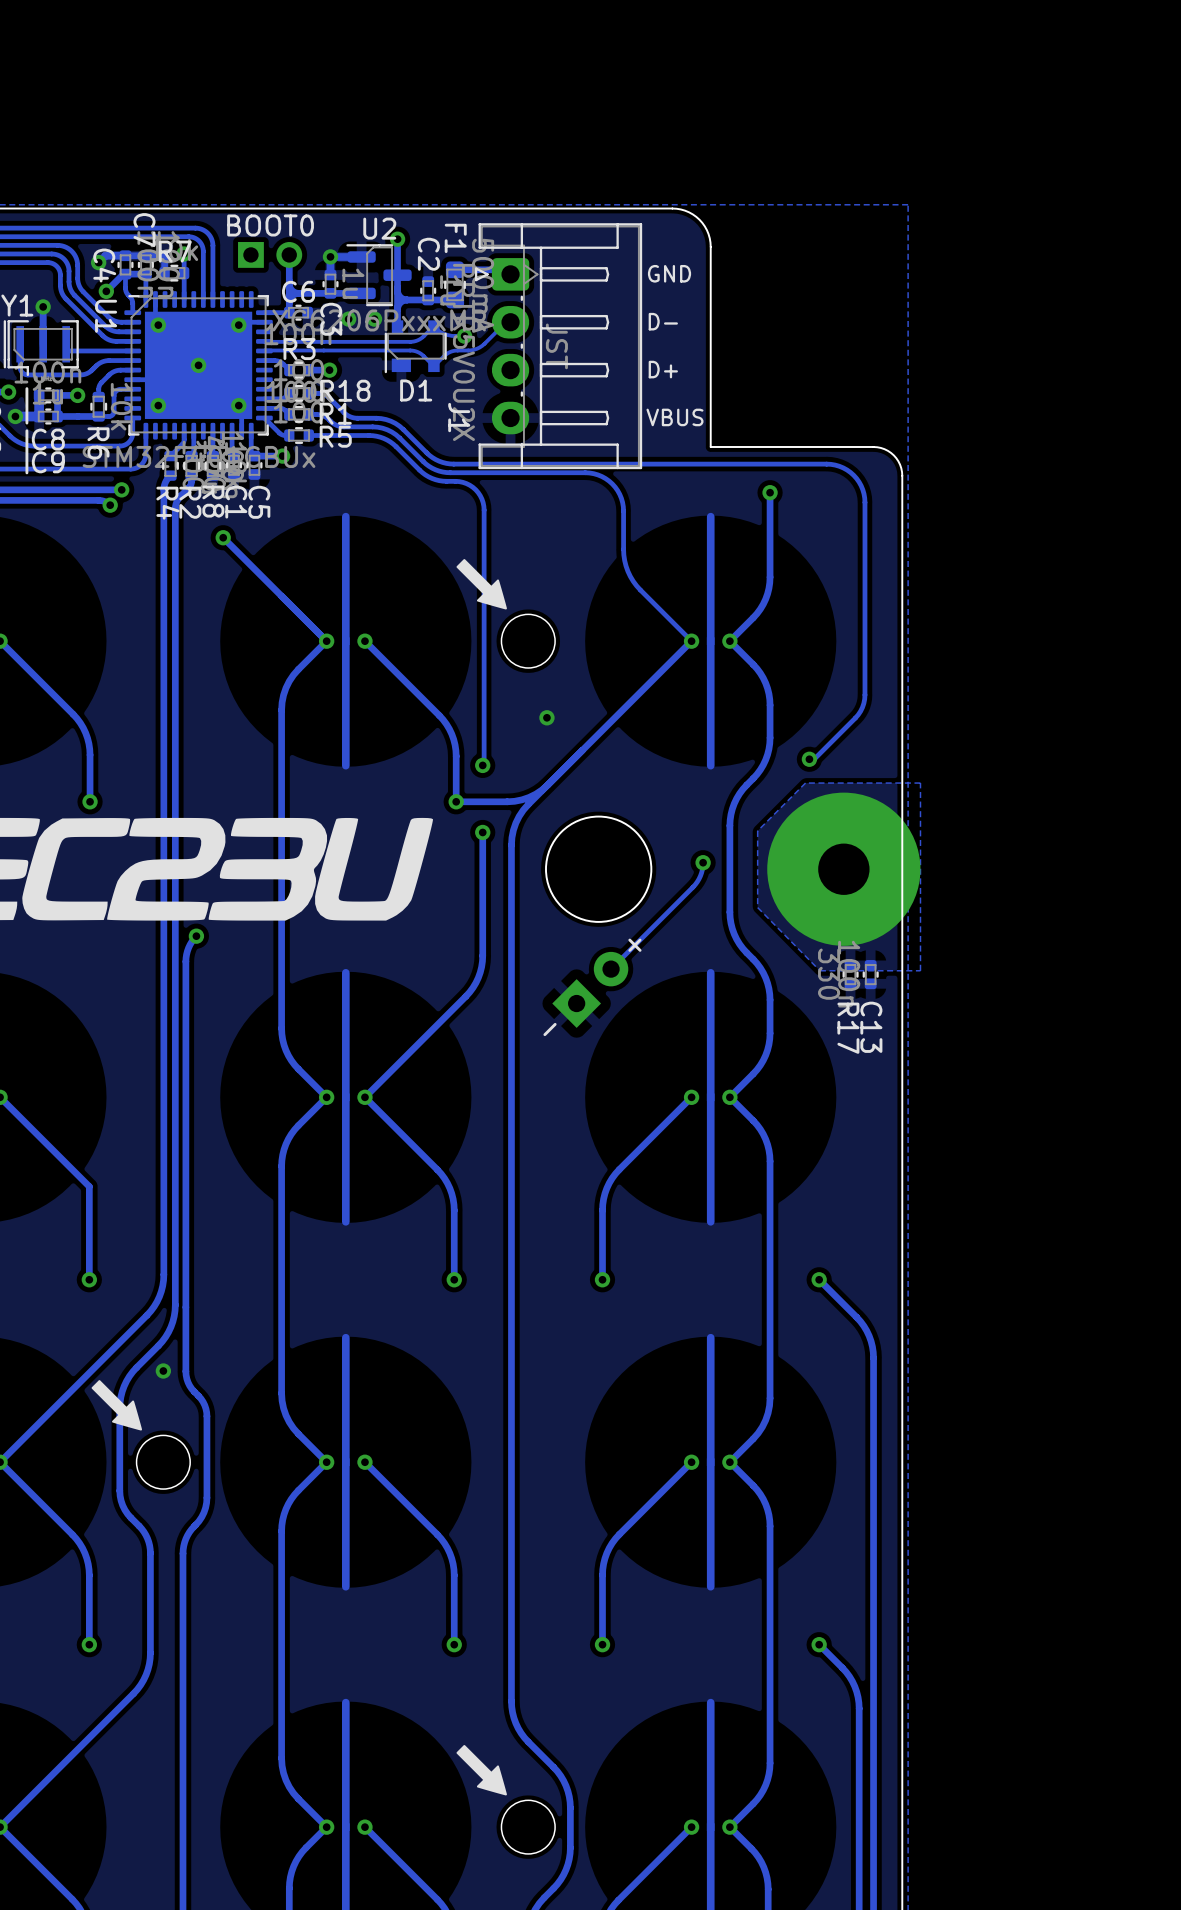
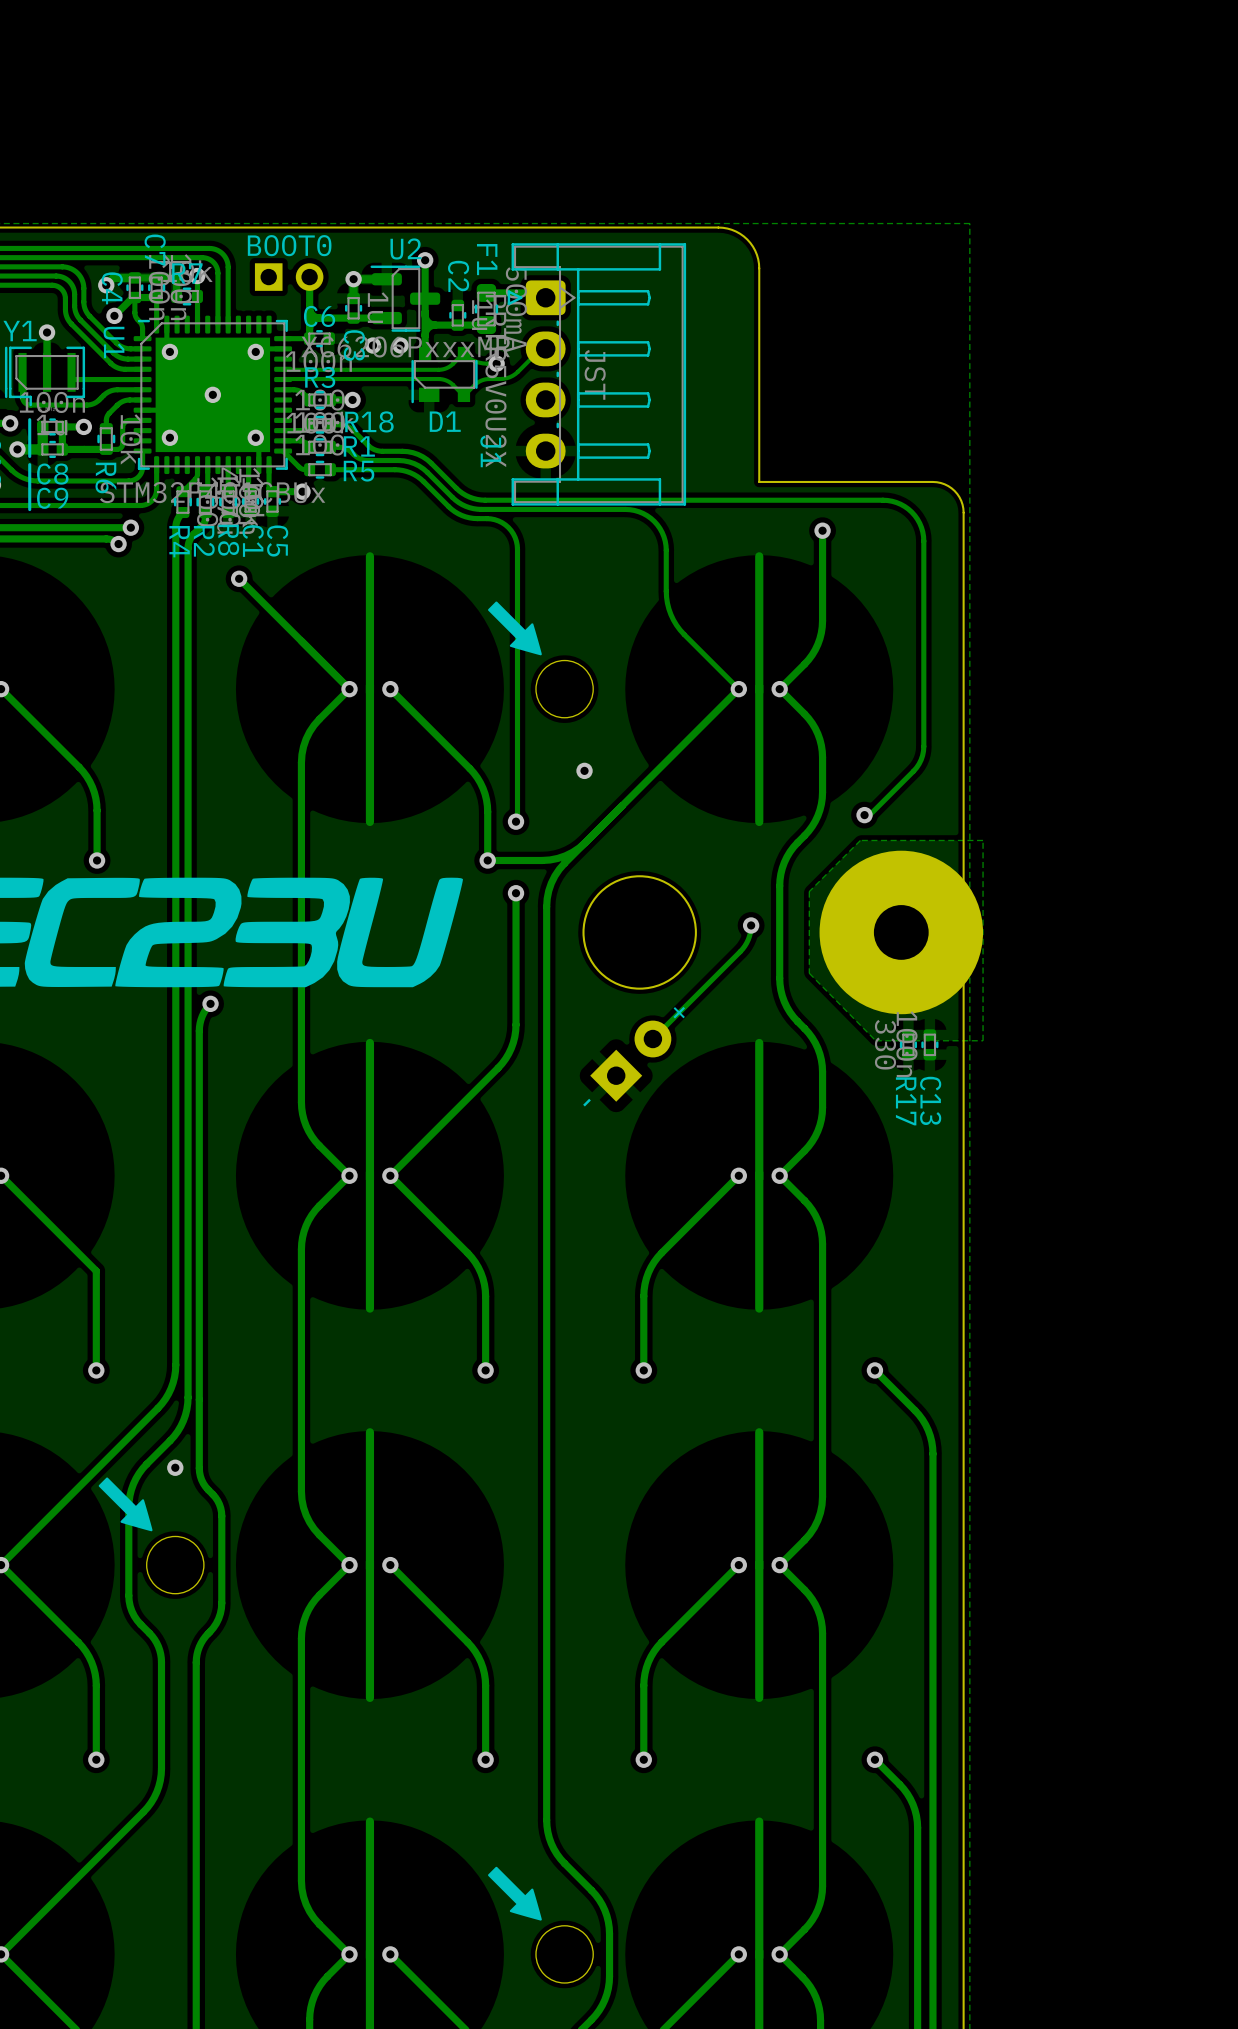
text: GND (669, 273) -> none
text: D- (663, 321) -> none
text: D+ (663, 369) -> none
text: VBUS (674, 417) -> none

